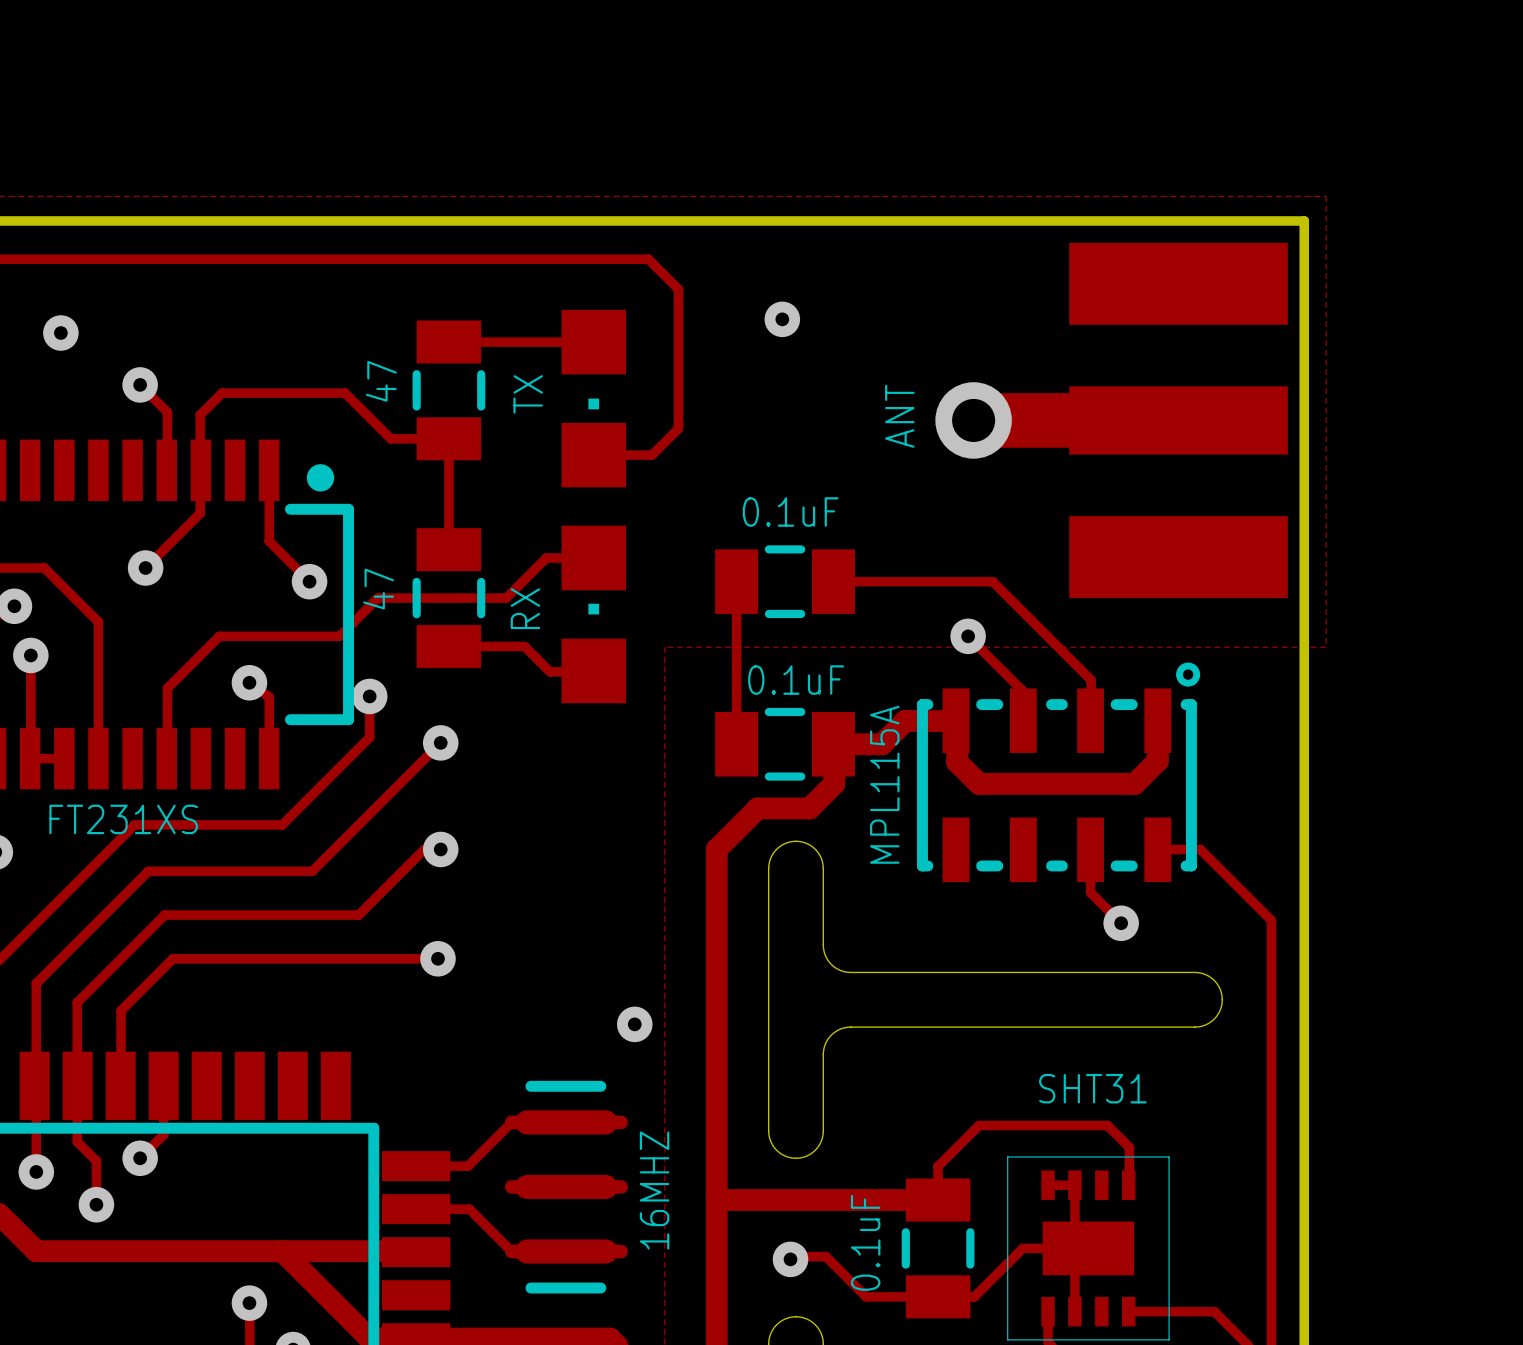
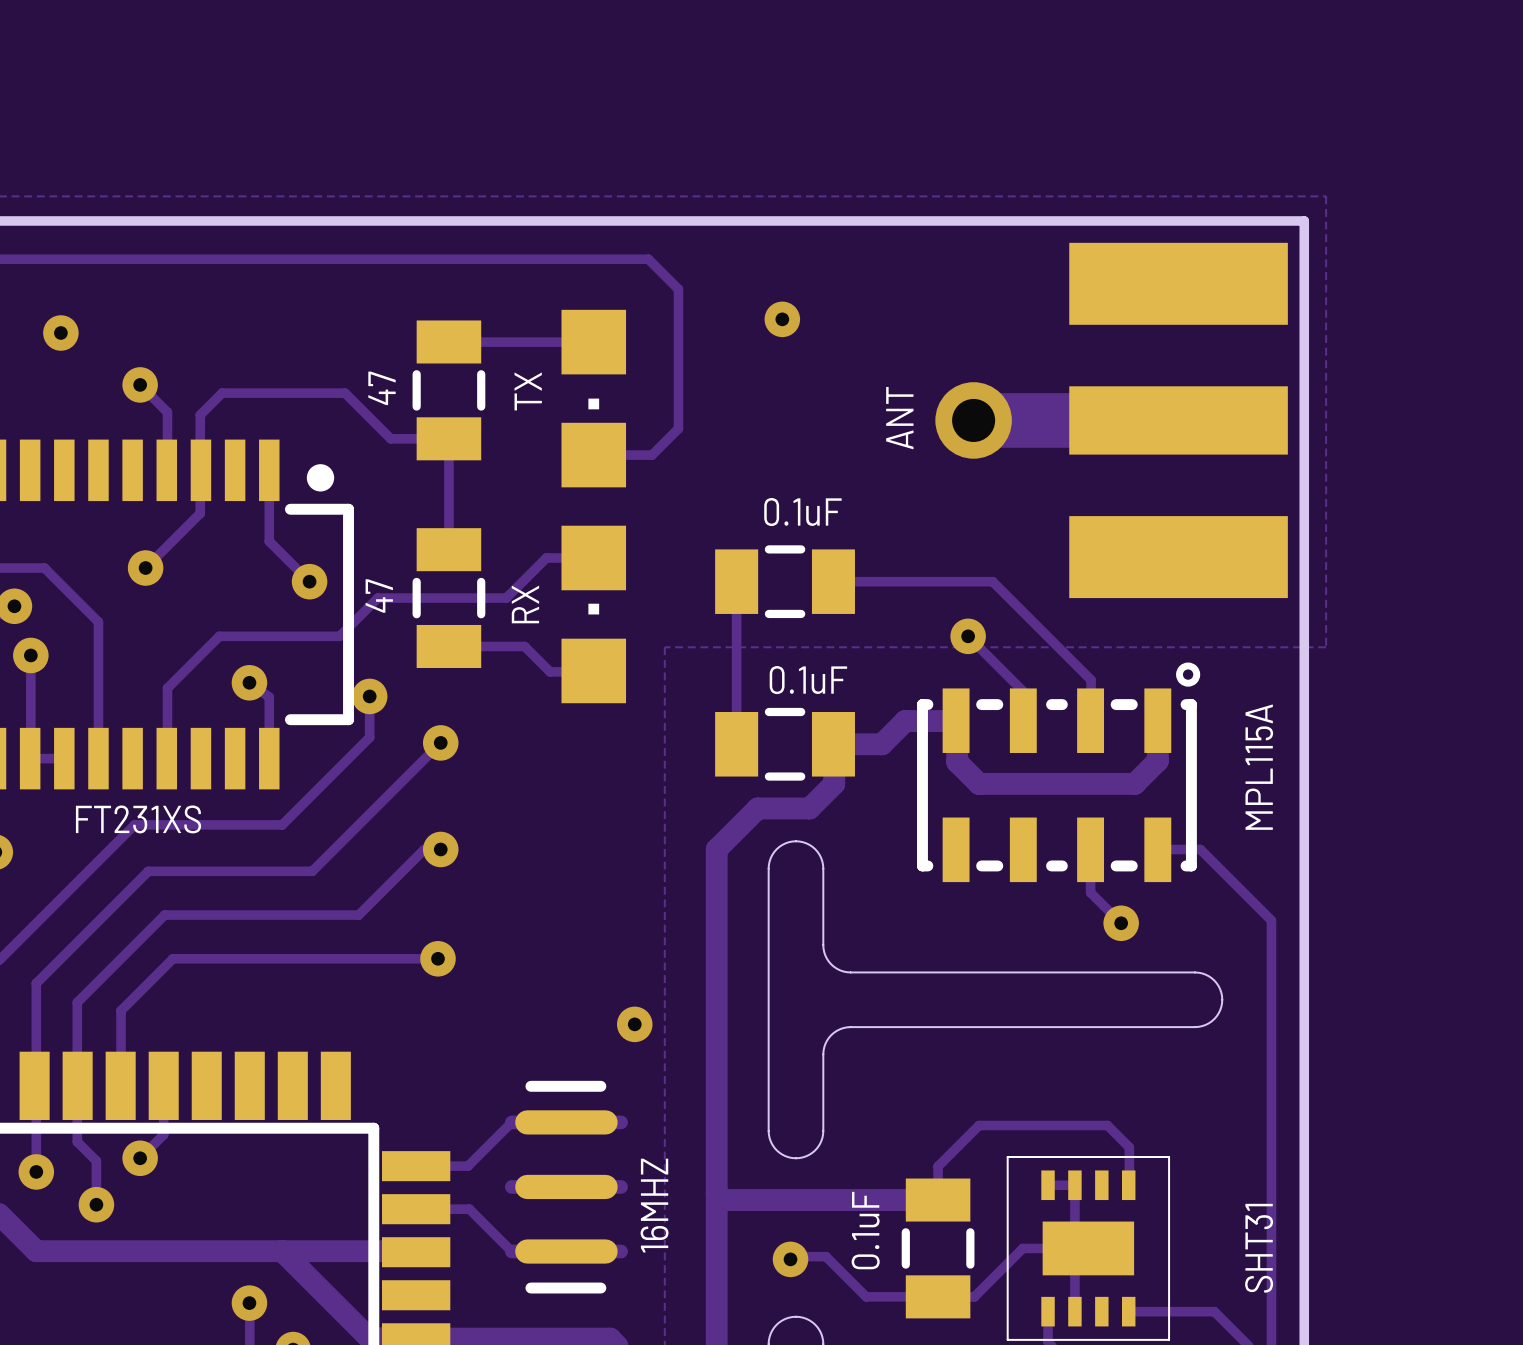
part value position: MPL115A (884, 784) -> MPL115A (1259, 767)
part value rotation: 0° (1092, 1088) -> 90° counterclockwise (1259, 1248)
part value position: SHT31 (1092, 1088) -> SHT31 (1259, 1248)

